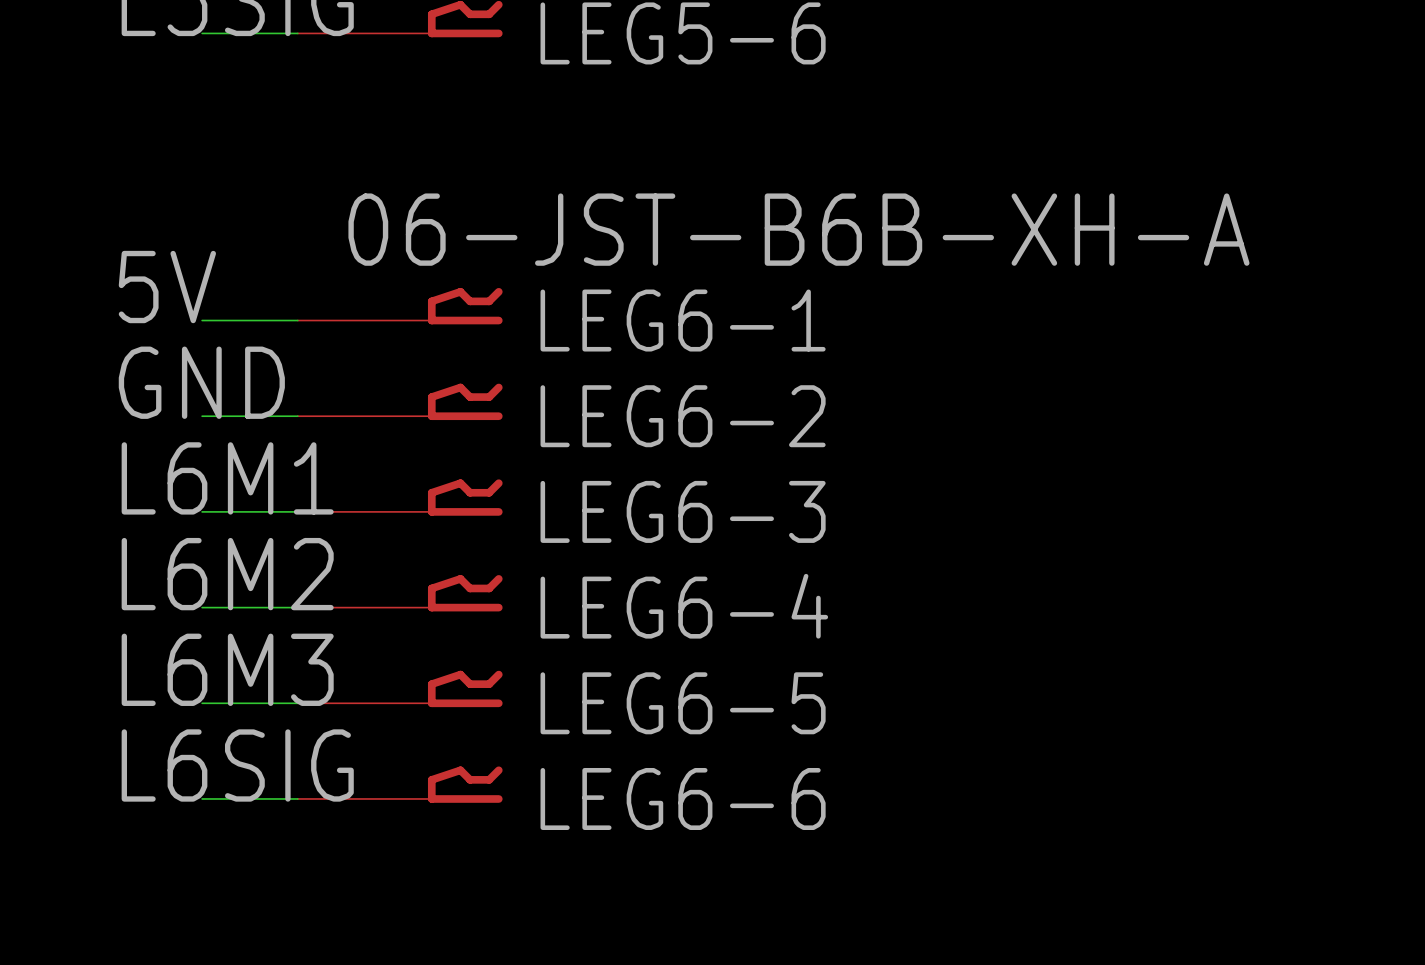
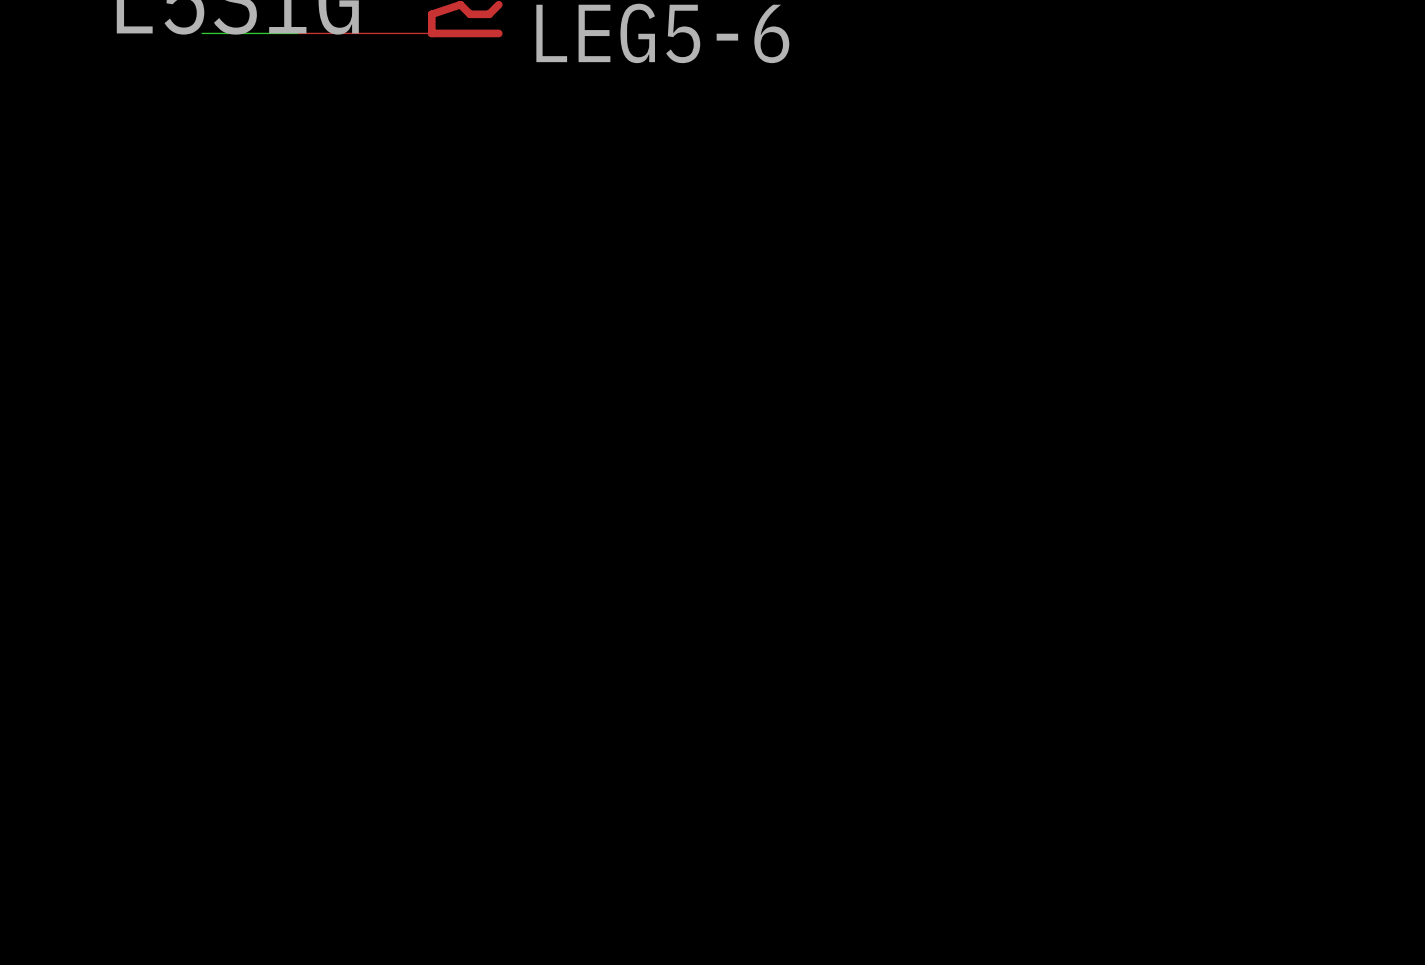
label: 5V (167, 287) -> none
LEG6-1: 06-JST-B6B-XH-A (400, 306) -> none
wire: (202, 320) (297, 320) -> none
label: GND (201, 382) -> none
LEG6-2: (400, 401) -> none
wire: (202, 416) (297, 416) -> none
label: L6M1 (227, 478) -> none
LEG6-3: (400, 497) -> none
wire: (202, 511) (297, 511) -> none
label: L6M2 (227, 574) -> none
LEG6-4: (400, 593) -> none
wire: (202, 607) (297, 607) -> none
label: L6M3 (227, 669) -> none
LEG6-5: (400, 688) -> none
wire: (202, 703) (297, 703) -> none
label: L6SIG (237, 765) -> none
LEG6-6: (400, 784) -> none
wire: (202, 798) (297, 798) -> none

